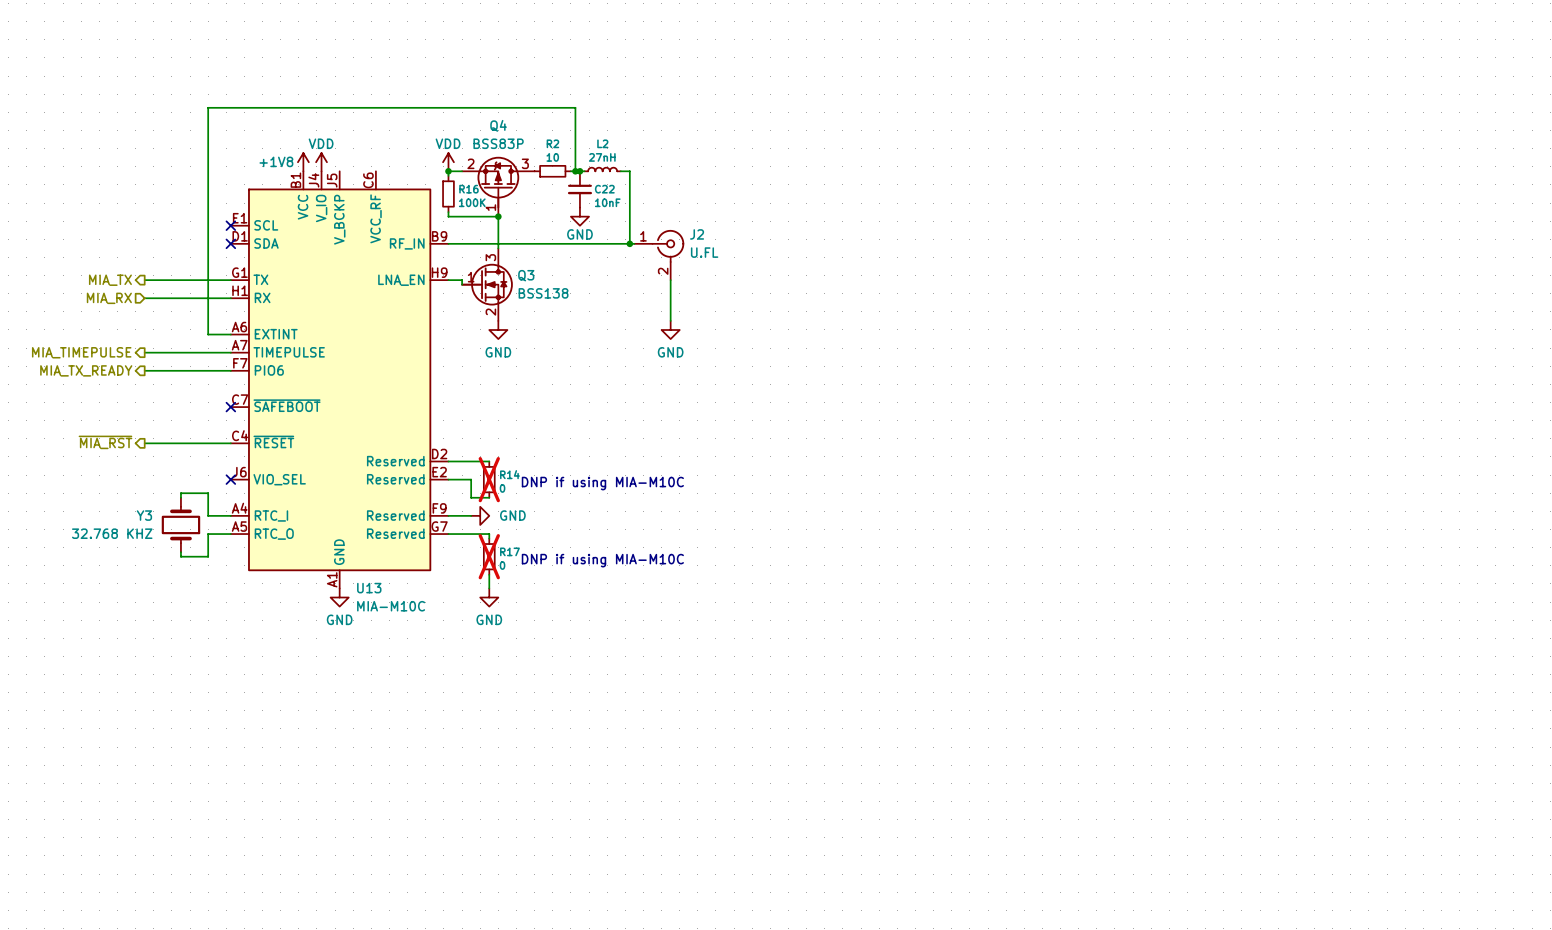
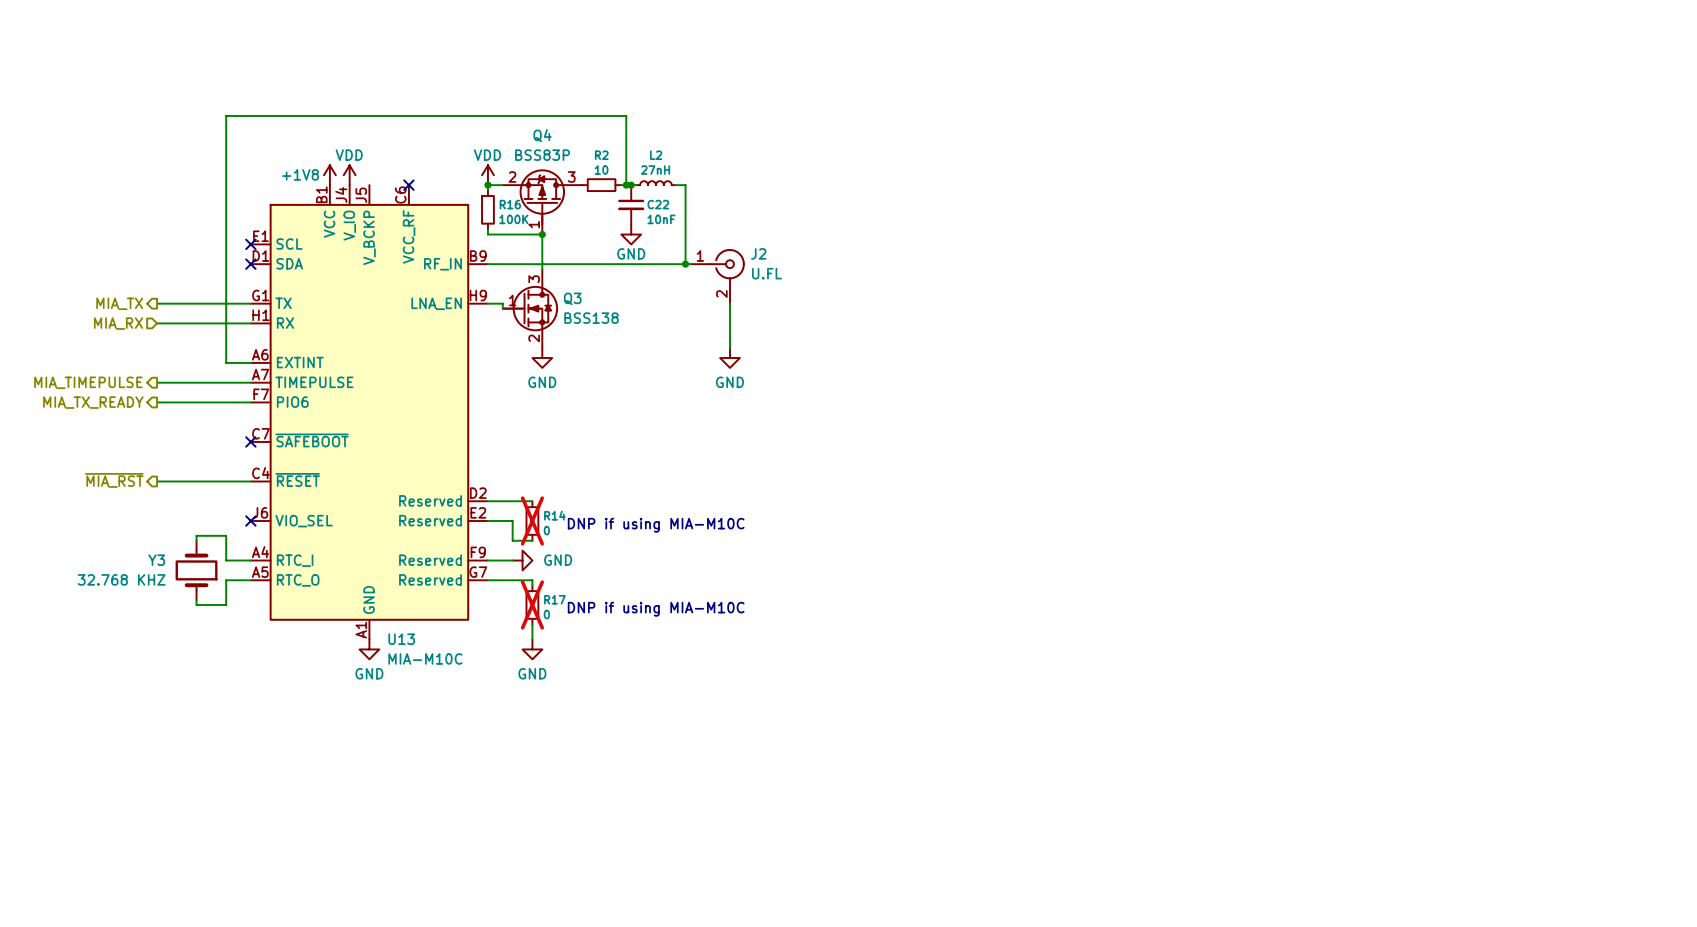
no-connect mark: none -> (408, 185)

